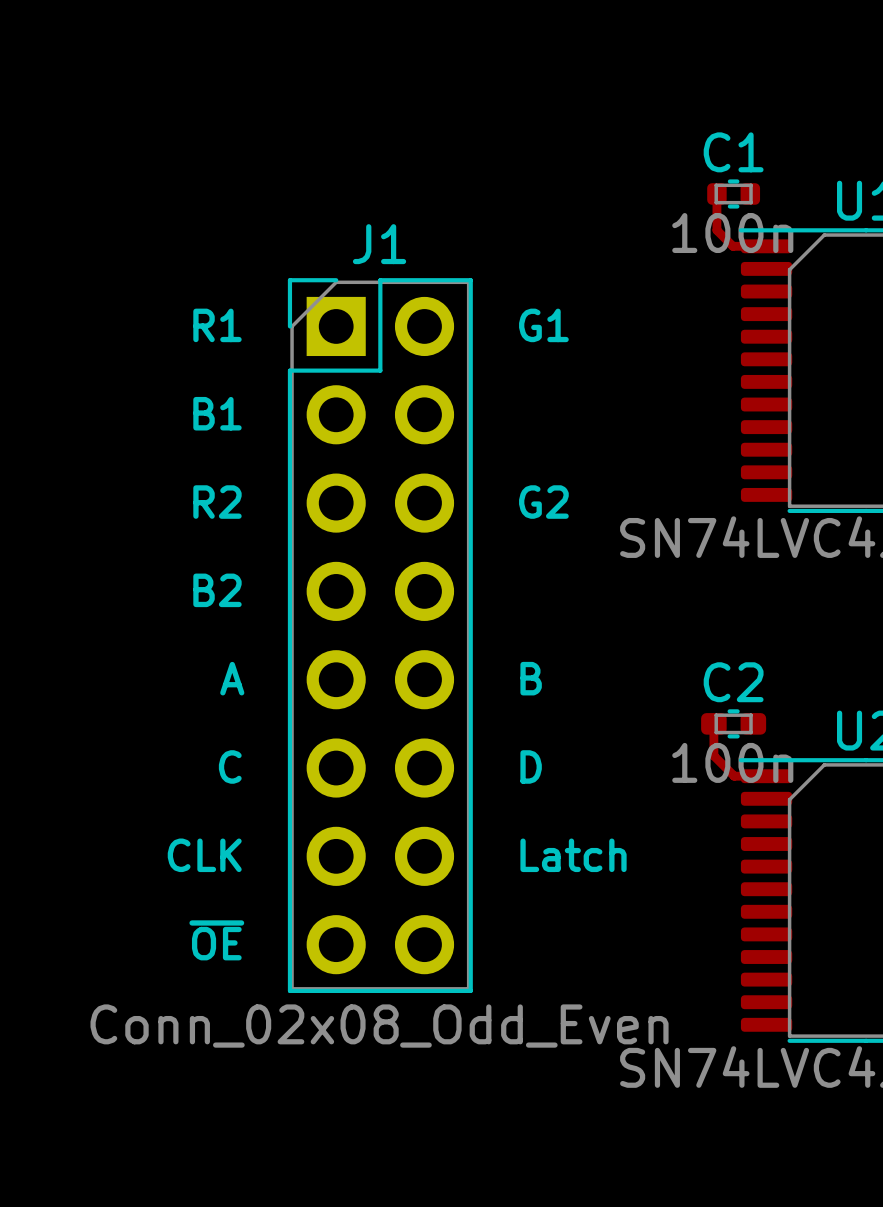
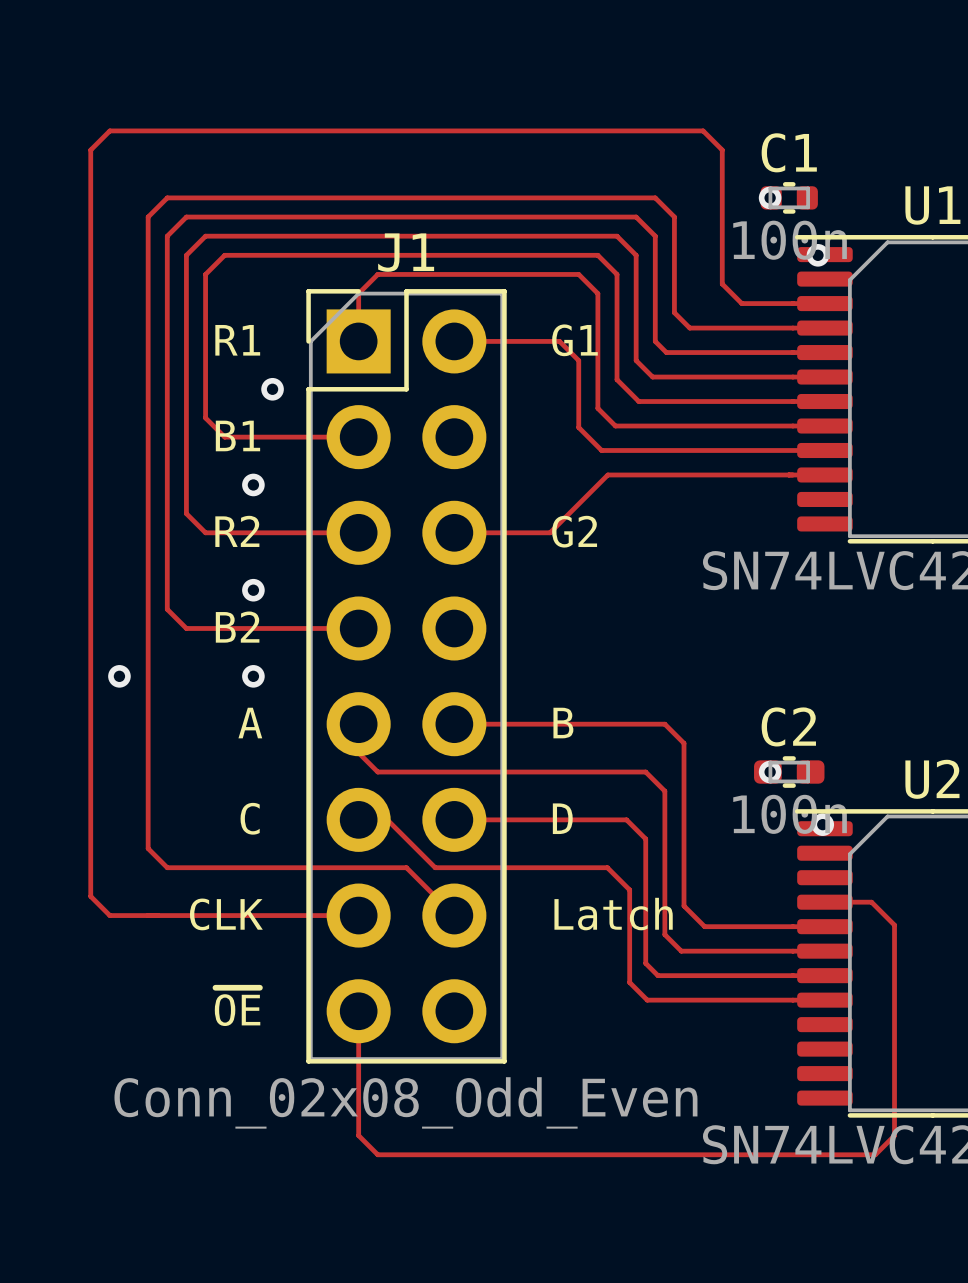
via: none -> (770, 197)
track: (716, 193) (716, 230) (732, 246) (766, 246) -> none
via: none -> (817, 255)
track: none -> (824, 303) (741, 303) (722, 284) (722, 150) (703, 130) (109, 130) (90, 150) (90, 896) (109, 915) (358, 915)
track: none -> (824, 328) (689, 328) (674, 312) (674, 217) (655, 197) (167, 197) (148, 217) (148, 848) (167, 867) (406, 867) (454, 915)
track: none -> (358, 341) (358, 293) (377, 274) (578, 274) (597, 293) (597, 408) (615, 426) (824, 426)
track: none -> (454, 341) (559, 341) (578, 360) (578, 427) (601, 450) (824, 450)
track: none -> (824, 352) (666, 352) (655, 341) (655, 236) (636, 217) (186, 217) (167, 236) (167, 609) (186, 628) (358, 628)
track: none -> (824, 377) (652, 377) (636, 360) (636, 255) (617, 236) (205, 236) (186, 255) (186, 513) (205, 532) (358, 532)
via: none -> (272, 389)
track: none -> (824, 401) (638, 401) (617, 379) (617, 274) (597, 255) (224, 255) (205, 274) (205, 417) (224, 437) (358, 437)
track: none -> (824, 474) (607, 474) (550, 532) (454, 532)
via: none -> (253, 484)
via: none -> (253, 590)
via: none -> (119, 676)
via: none -> (253, 676)
track: none -> (358, 724) (358, 752) (377, 772) (645, 772) (664, 791) (664, 934) (681, 951) (824, 951)
track: none -> (454, 724) (664, 724) (684, 743) (684, 905) (704, 926) (824, 926)
track: (713, 723) (713, 755) (734, 776) (766, 776) -> none
via: none -> (770, 772)
track: none -> (358, 819) (387, 819) (435, 867) (607, 867) (629, 889) (629, 982) (647, 1000) (824, 1000)
track: none -> (454, 819) (626, 819) (645, 839) (645, 963) (657, 975) (824, 975)
via: none -> (822, 824)
track: none -> (824, 902) (871, 902) (894, 925) (894, 1135) (875, 1154) (377, 1154) (358, 1135) (358, 1011)

